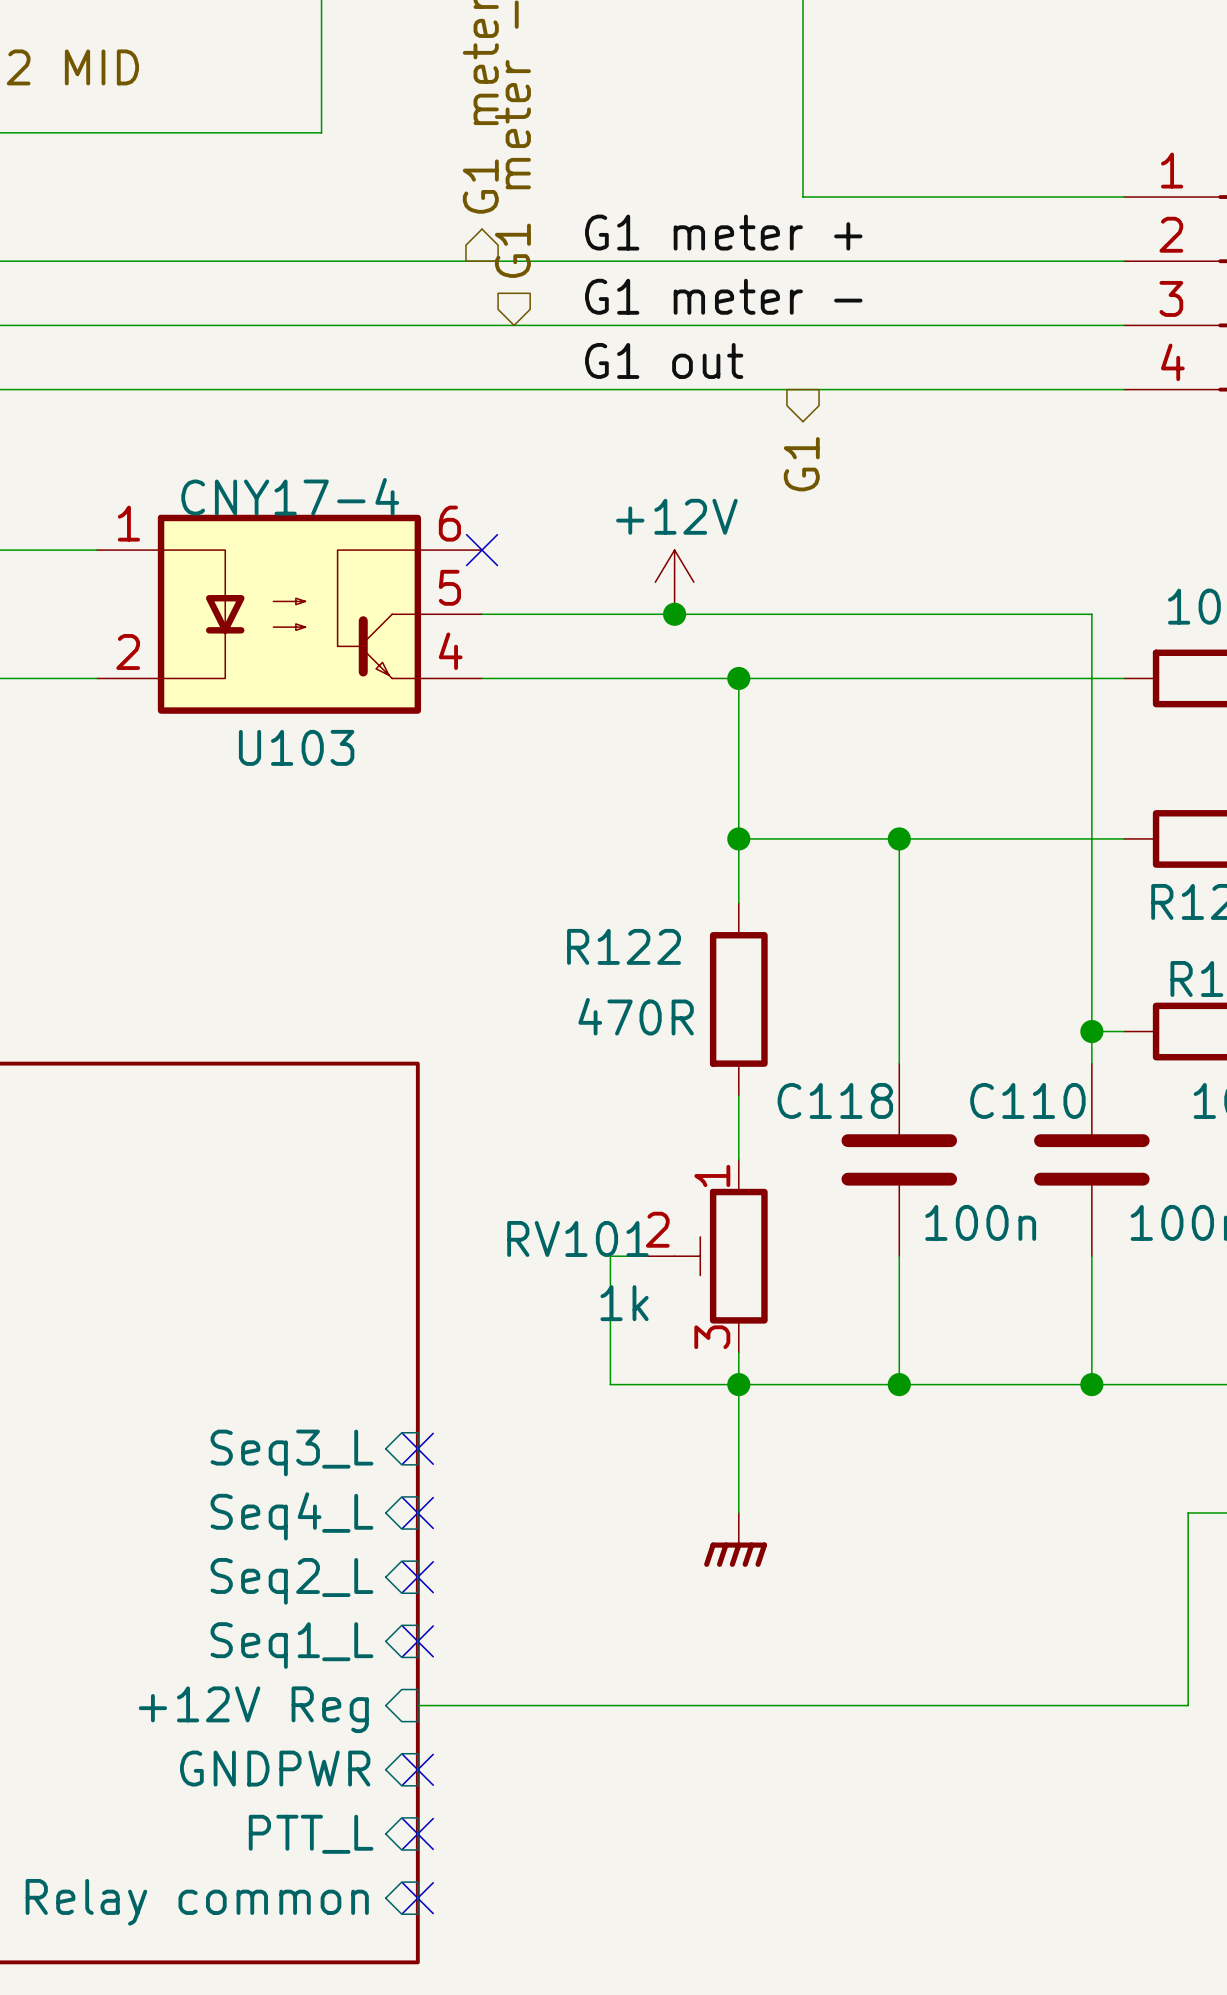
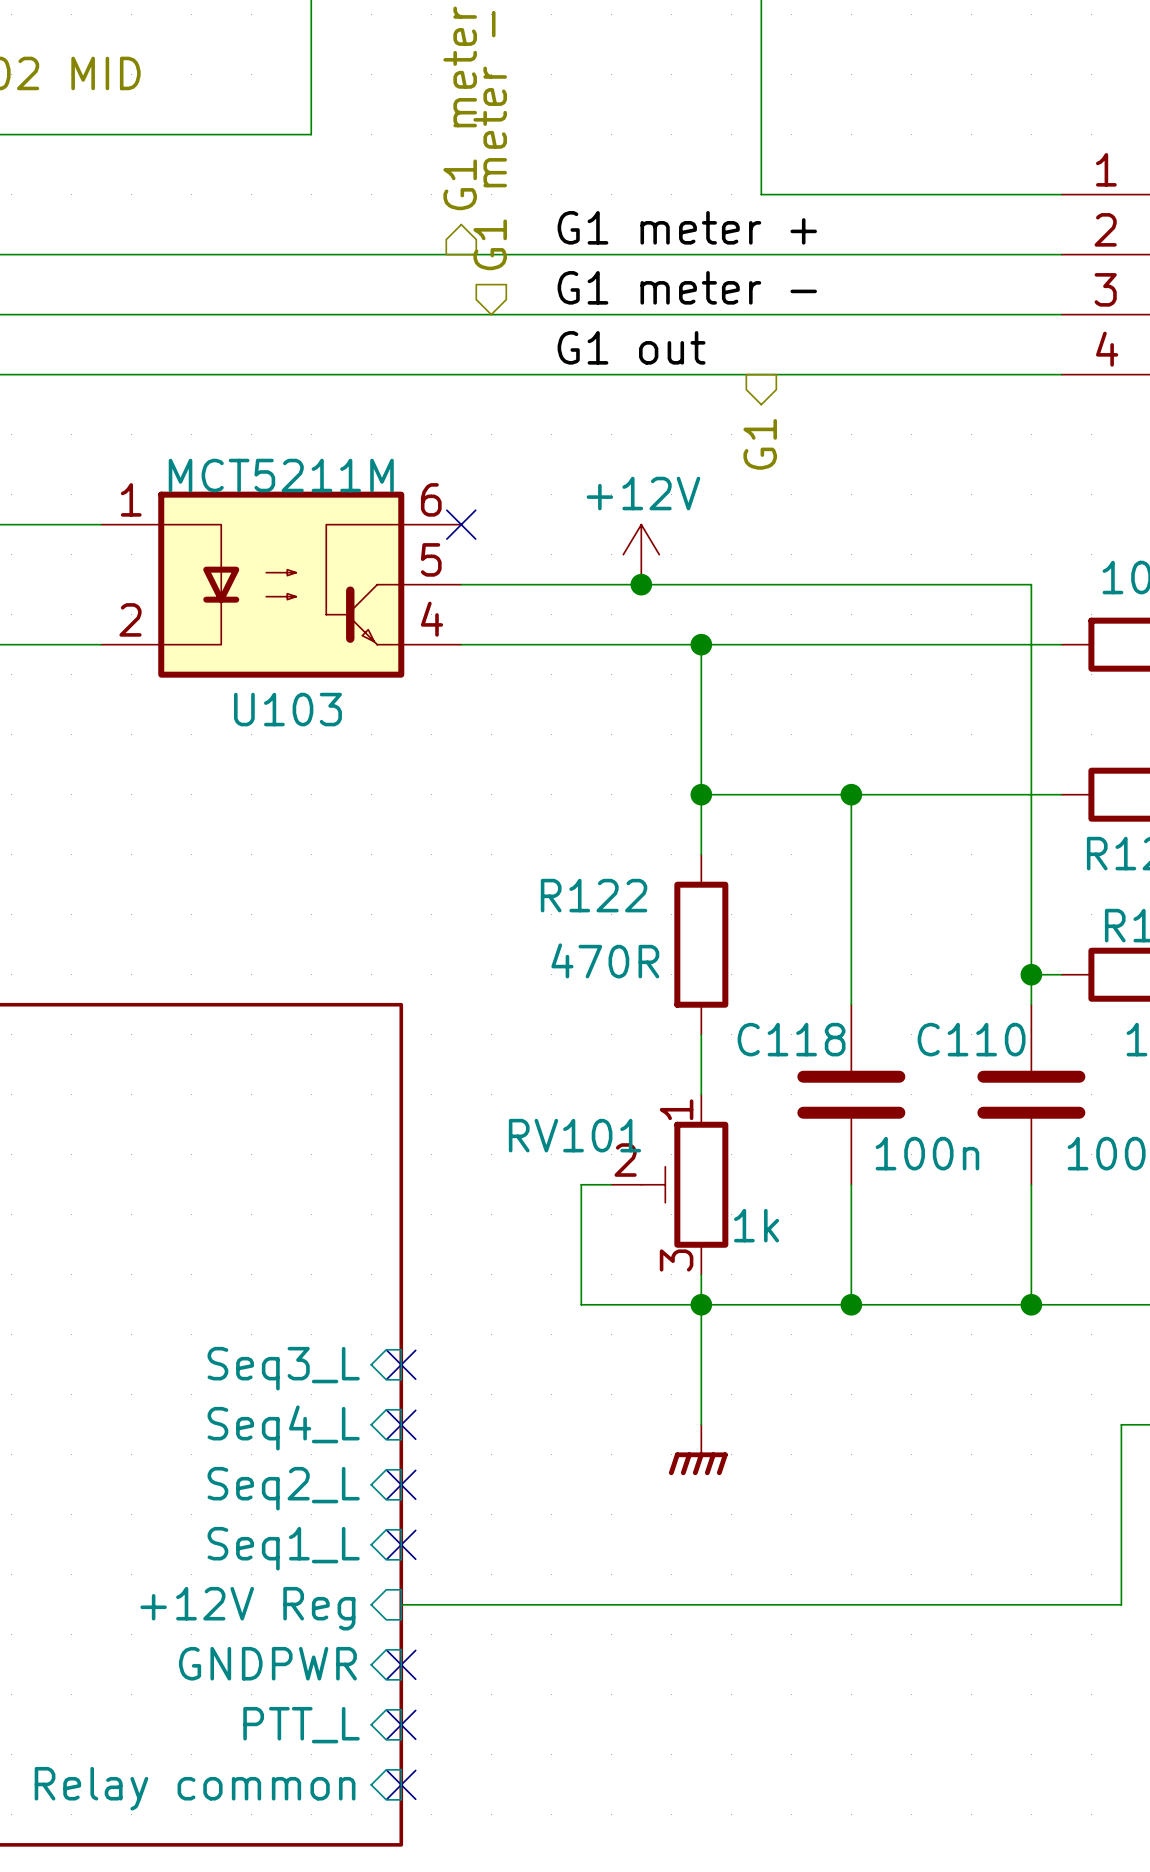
U103 value: CNY17-4 (290, 496) -> MCT5211M (281, 475)
RV101 name position: RV101 (577, 1238) -> RV101 (574, 1135)
RV101 value position: 1k (624, 1303) -> 1k (756, 1225)

